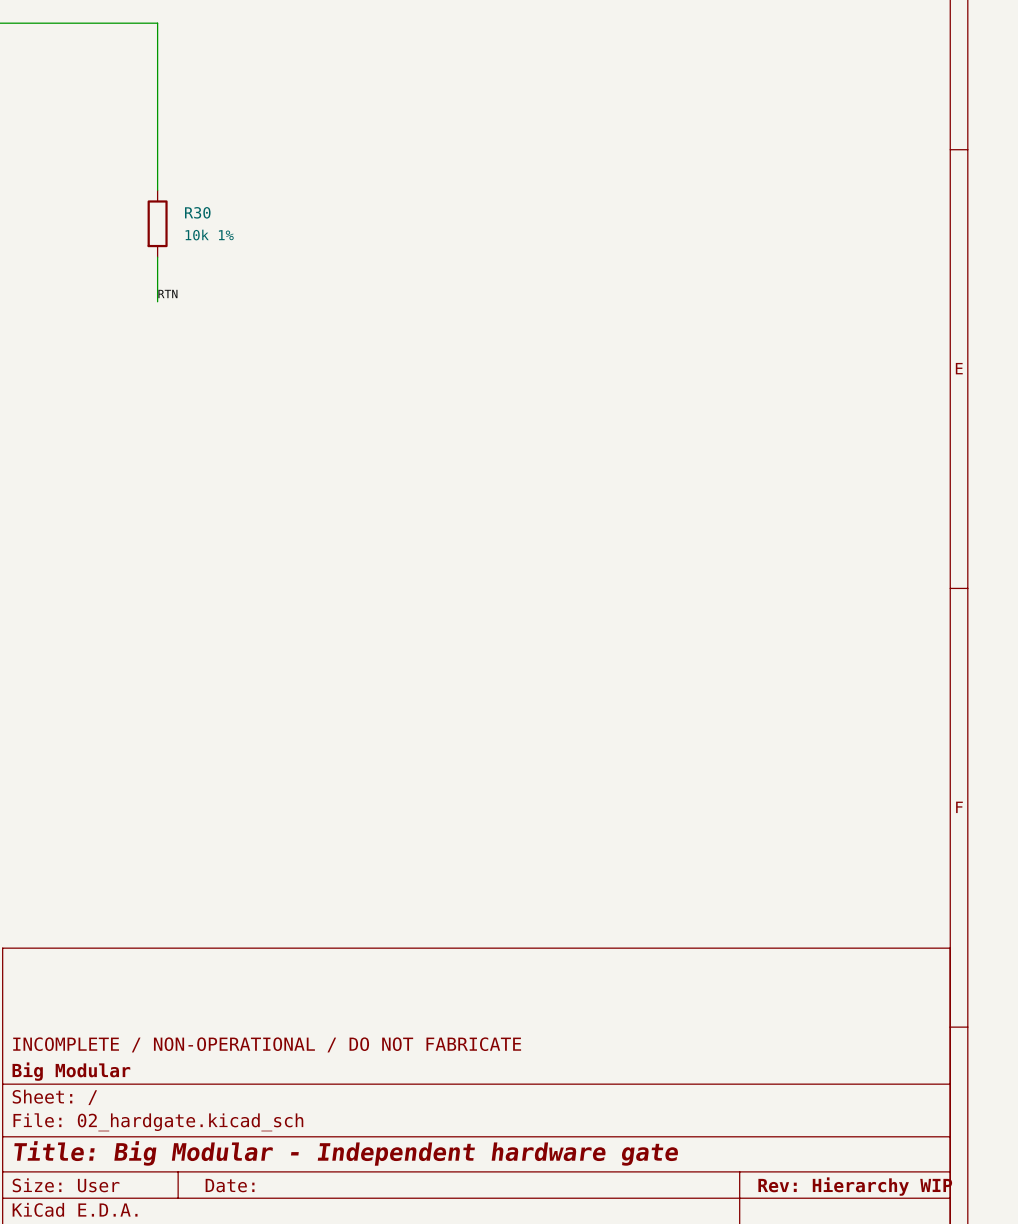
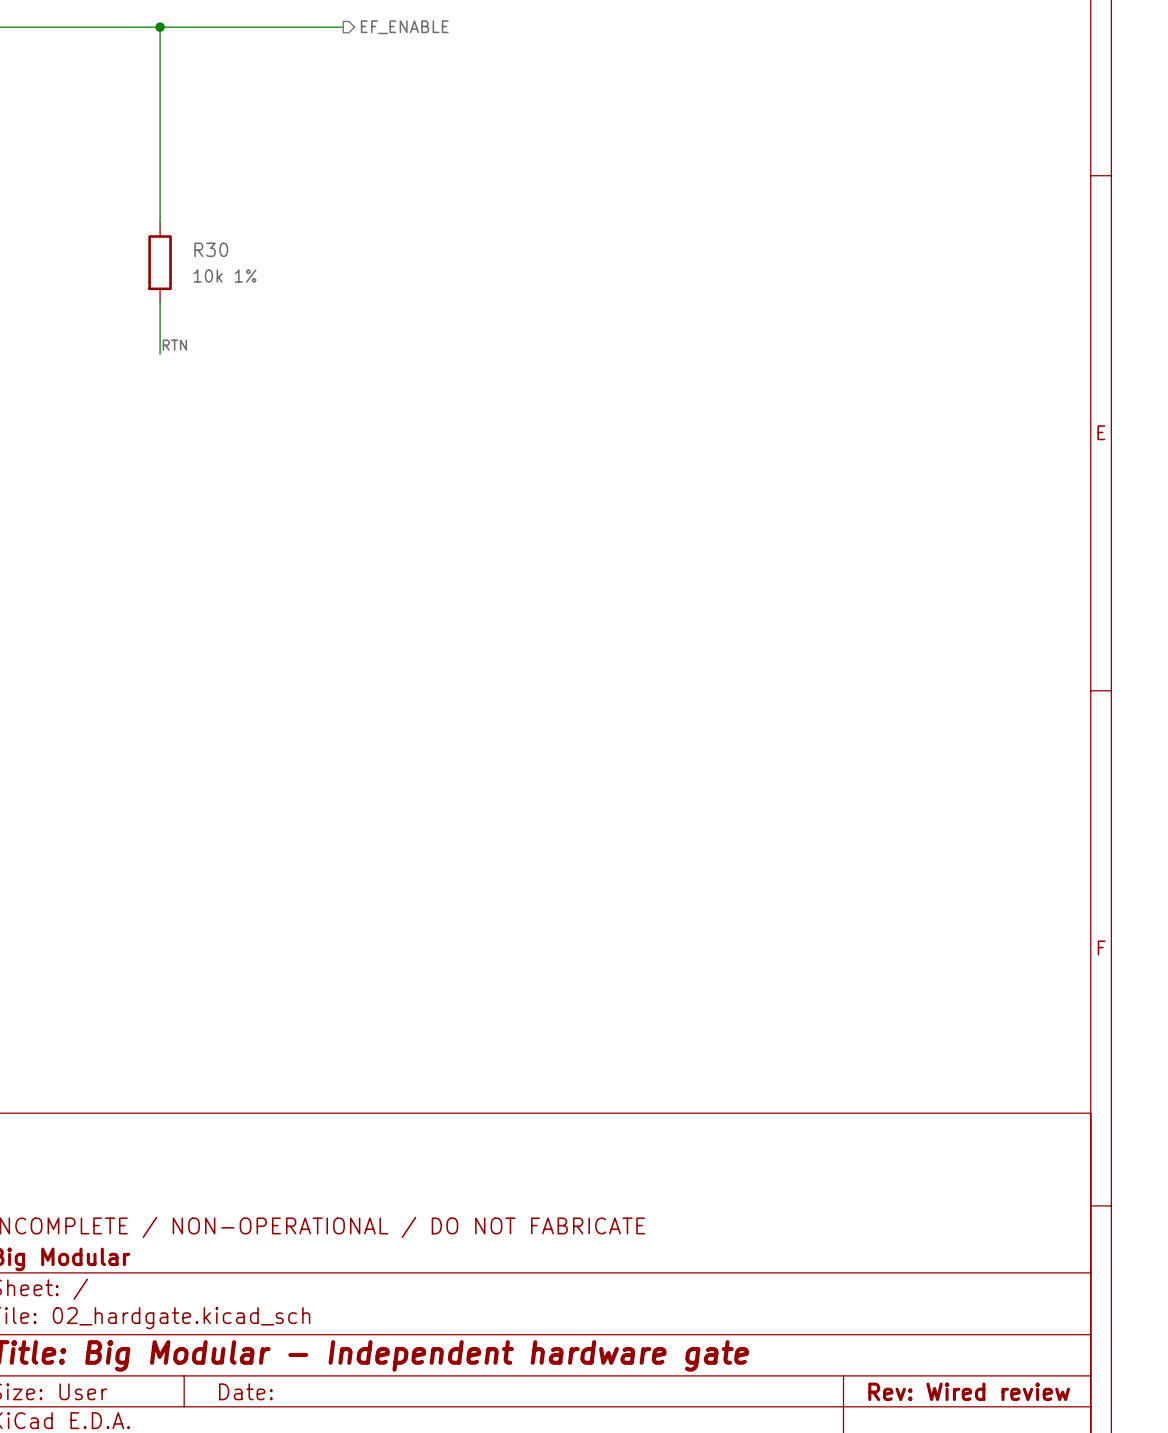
wire: none -> (160, 27) (343, 27)
junction: none -> (160, 27)
hierarchical label: none -> EF_ENABLE (404, 27)
title block: Rev: Hierarchy WIP (855, 1186) -> Rev: Wired review (969, 1391)

